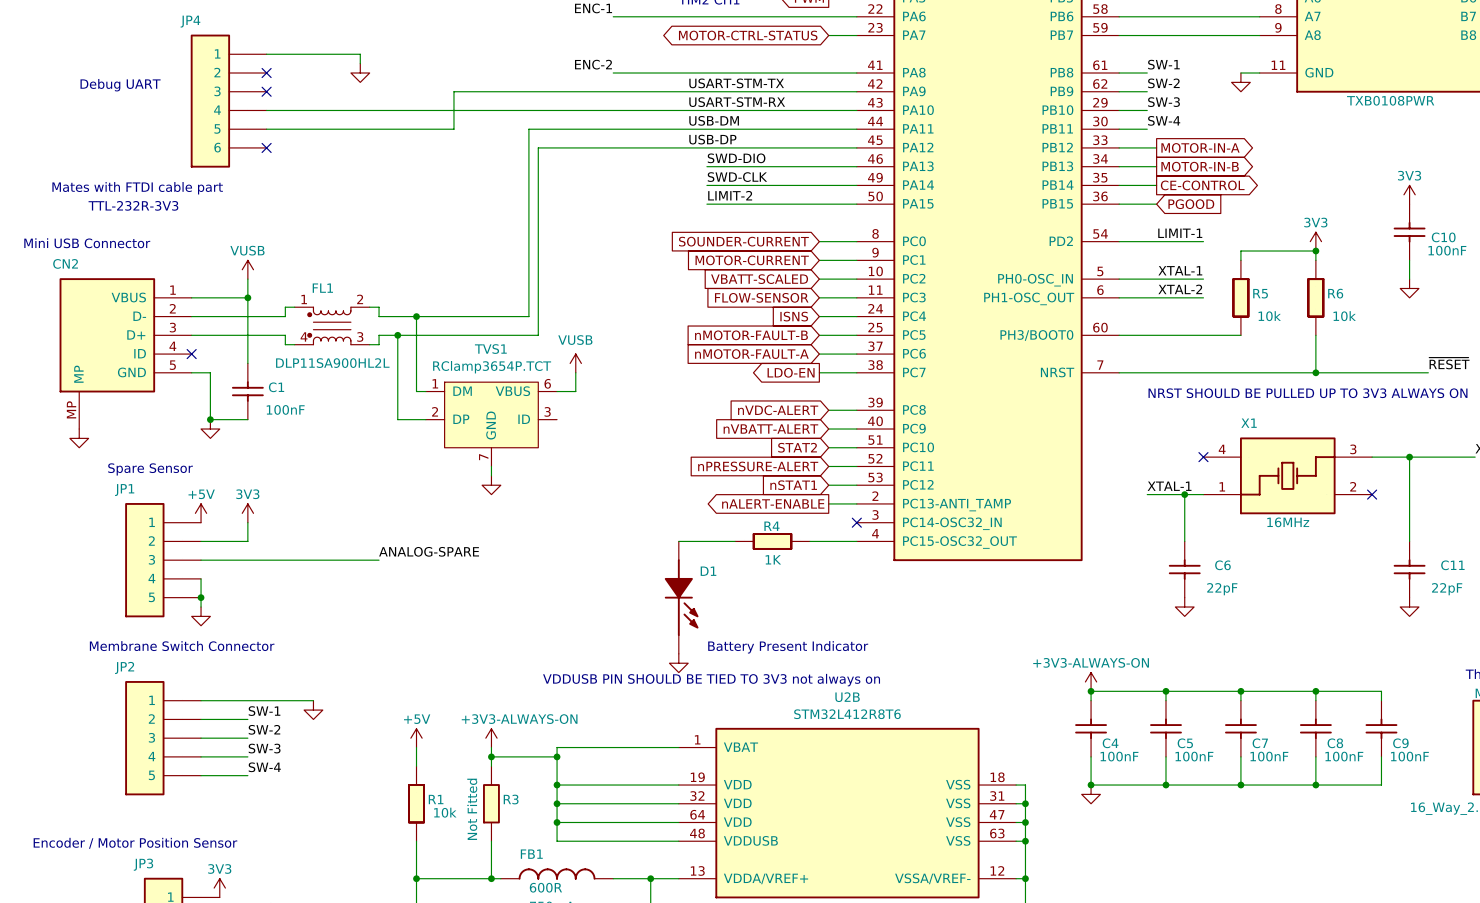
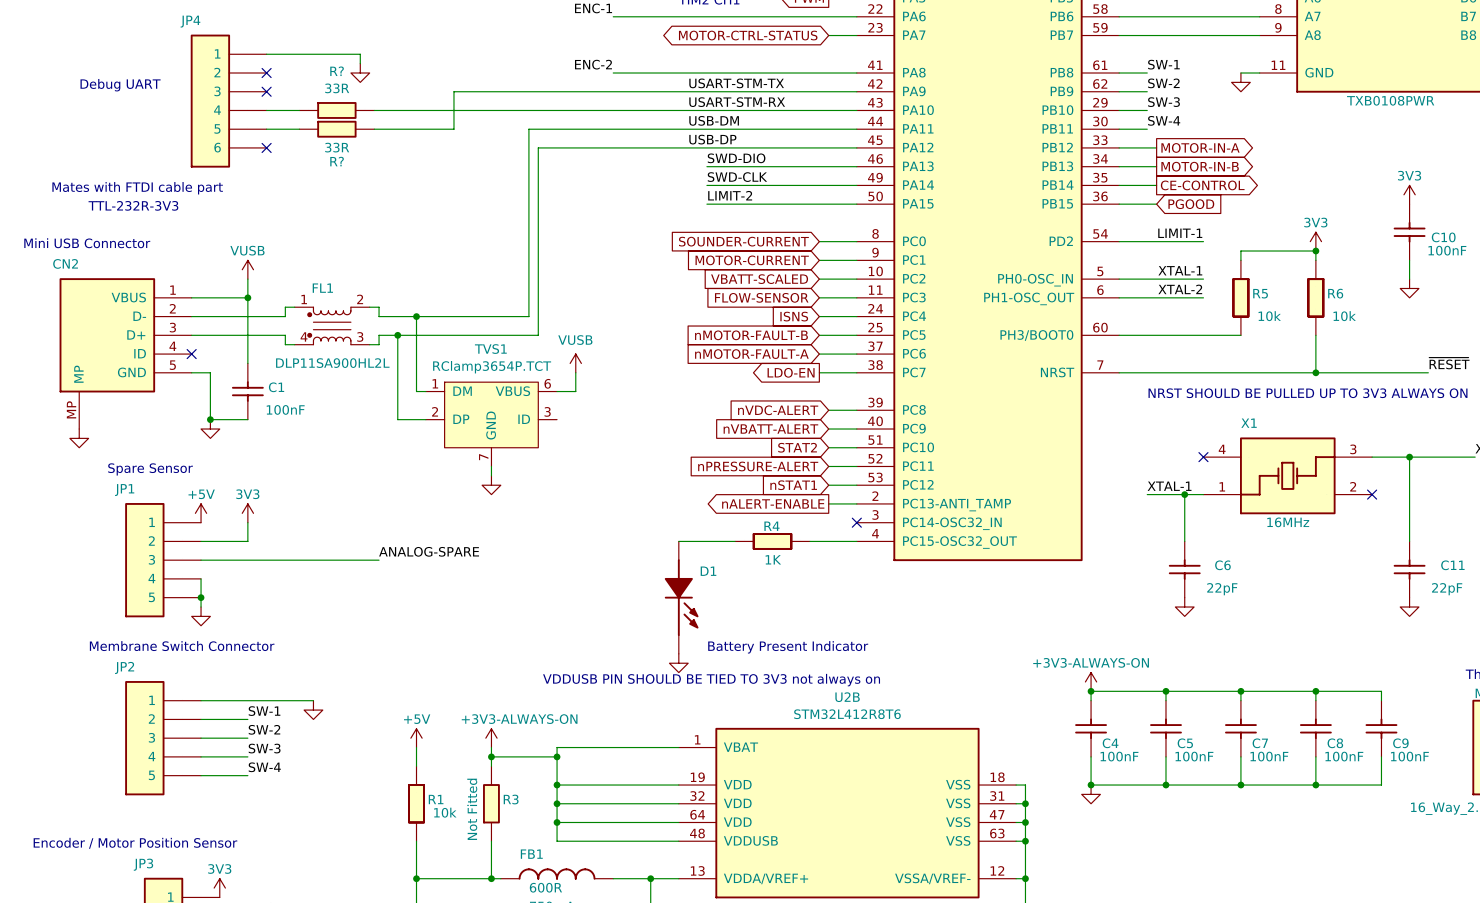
R?: none -> (336, 110)
R?: none -> (336, 129)

